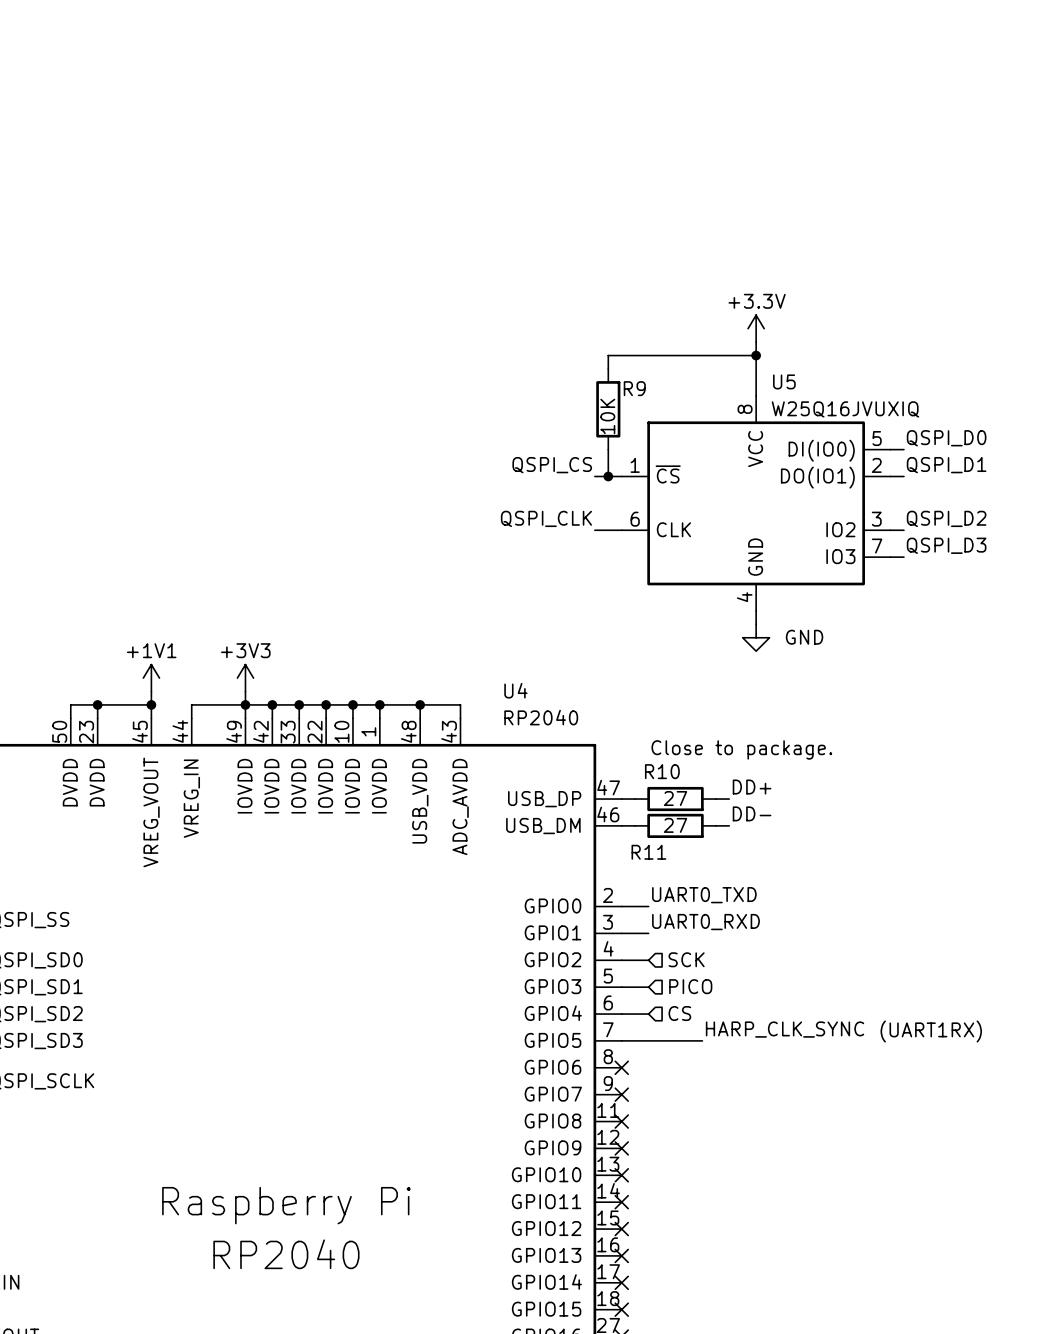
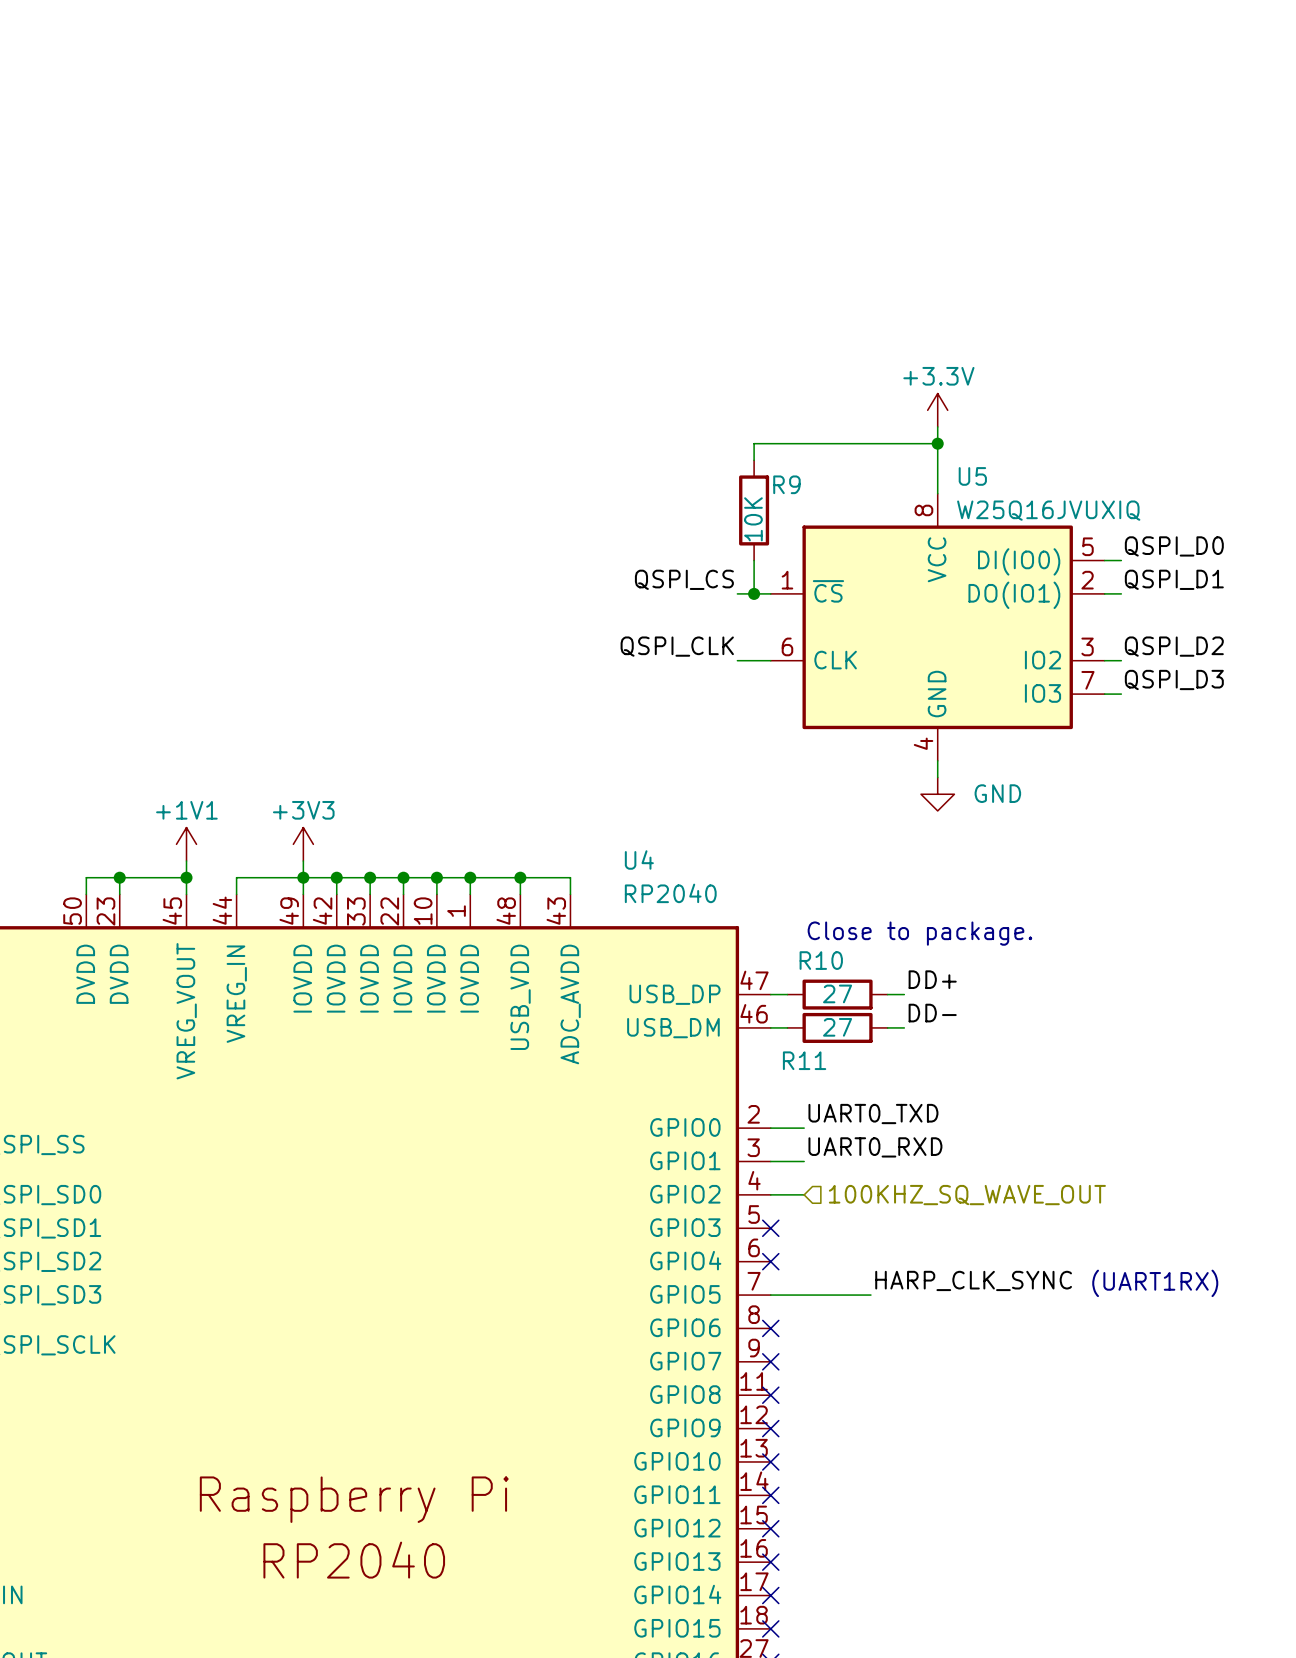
hierarchical label: SCK (686, 959) -> 100KHZ_SQ_WAVE_OUT (967, 1195)
hierarchical label: PICO (690, 986) -> none
wire: (621, 987) (648, 987) -> none
no-connect mark: none -> (770, 1228)
hierarchical label: CS (679, 1013) -> none
wire: (621, 1014) (648, 1014) -> none
no-connect mark: none -> (770, 1261)

